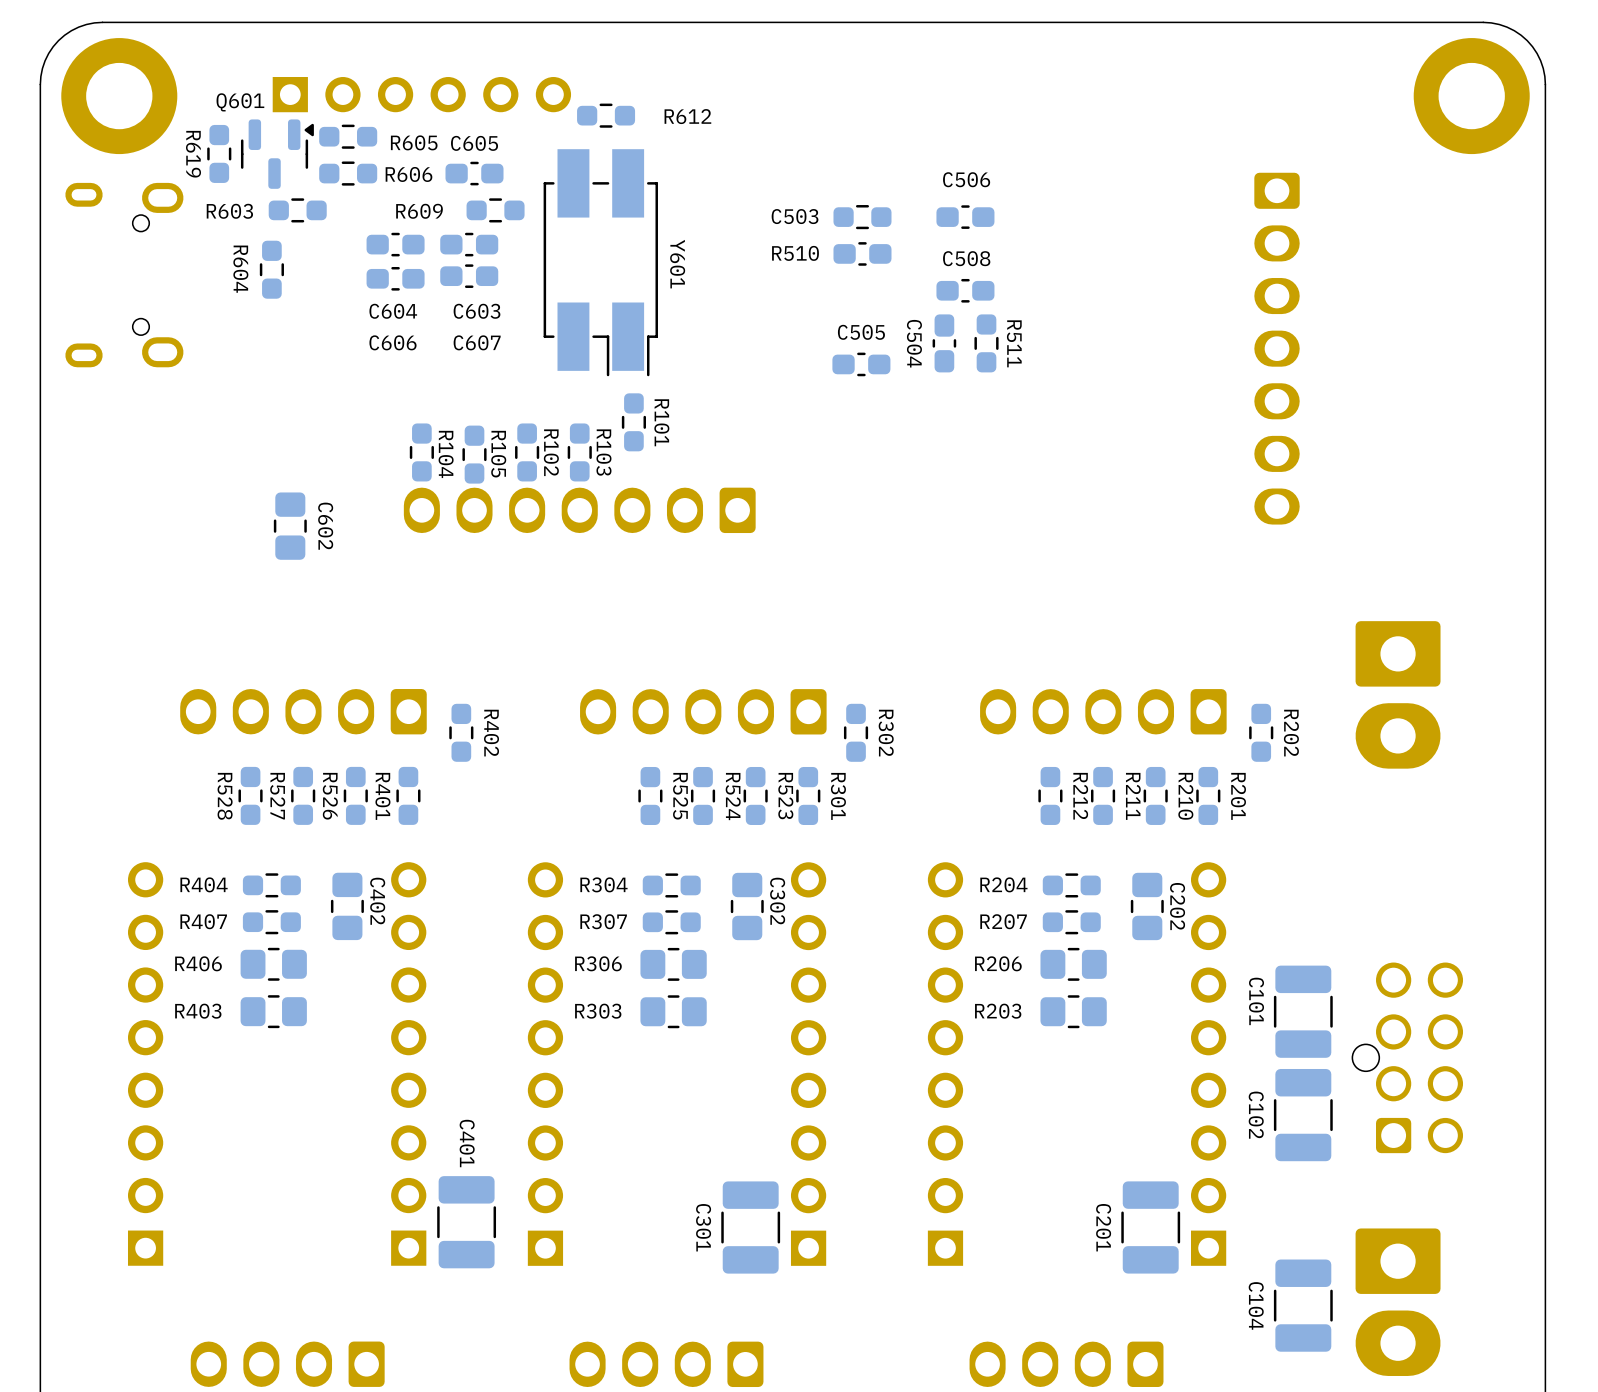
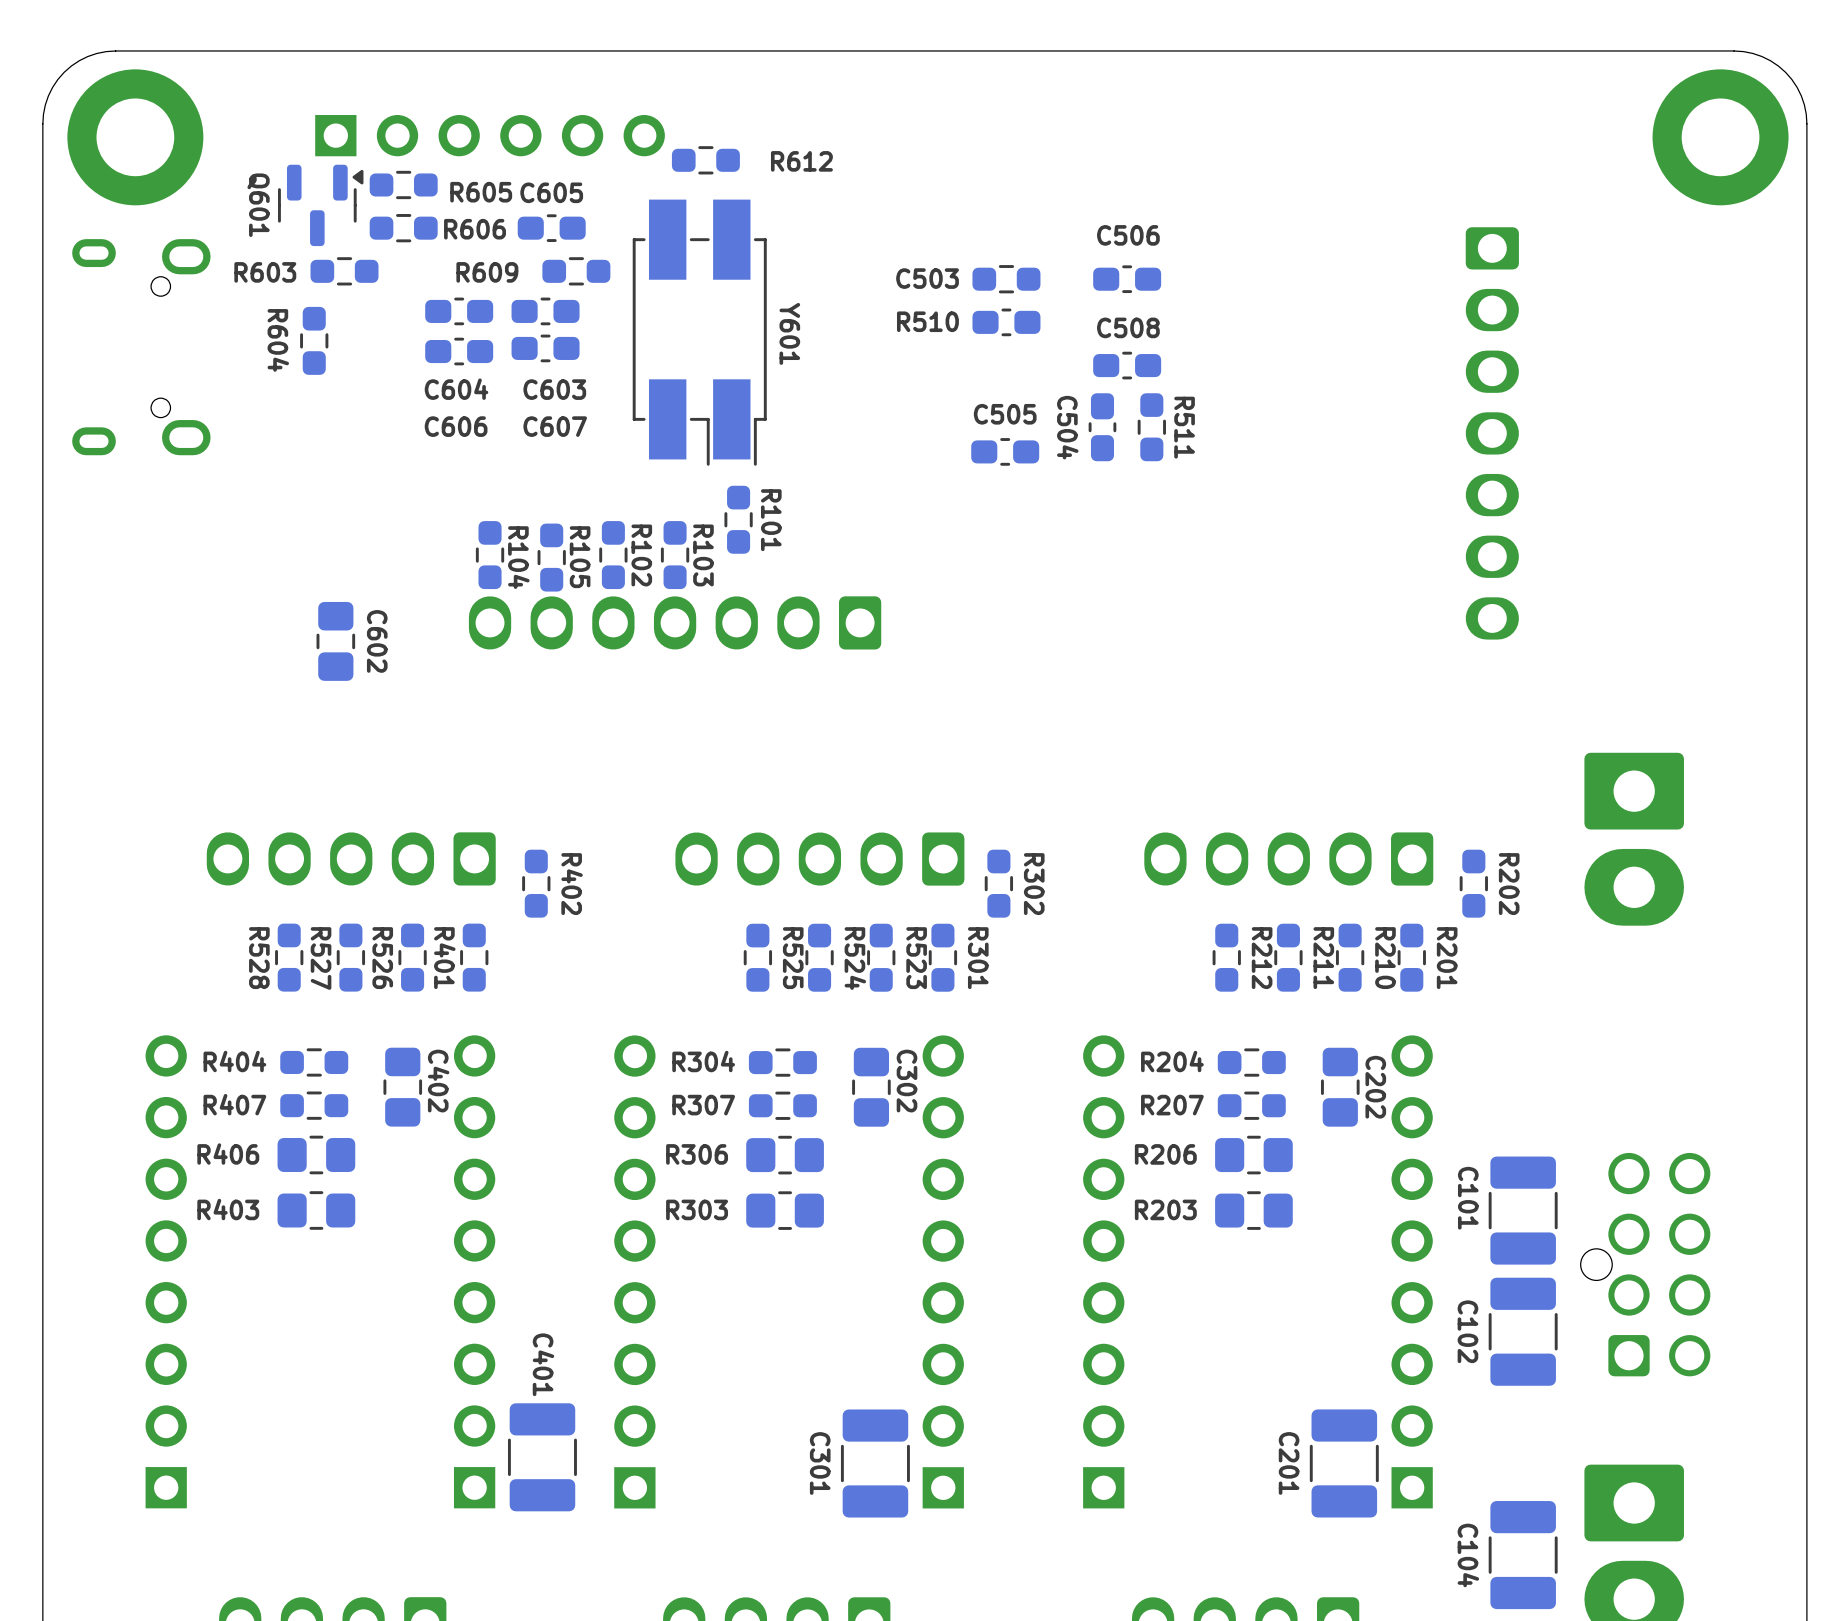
Q601 name rotation: 0° (240, 102) -> 90° clockwise (258, 205)
R619: (219, 153) -> none

